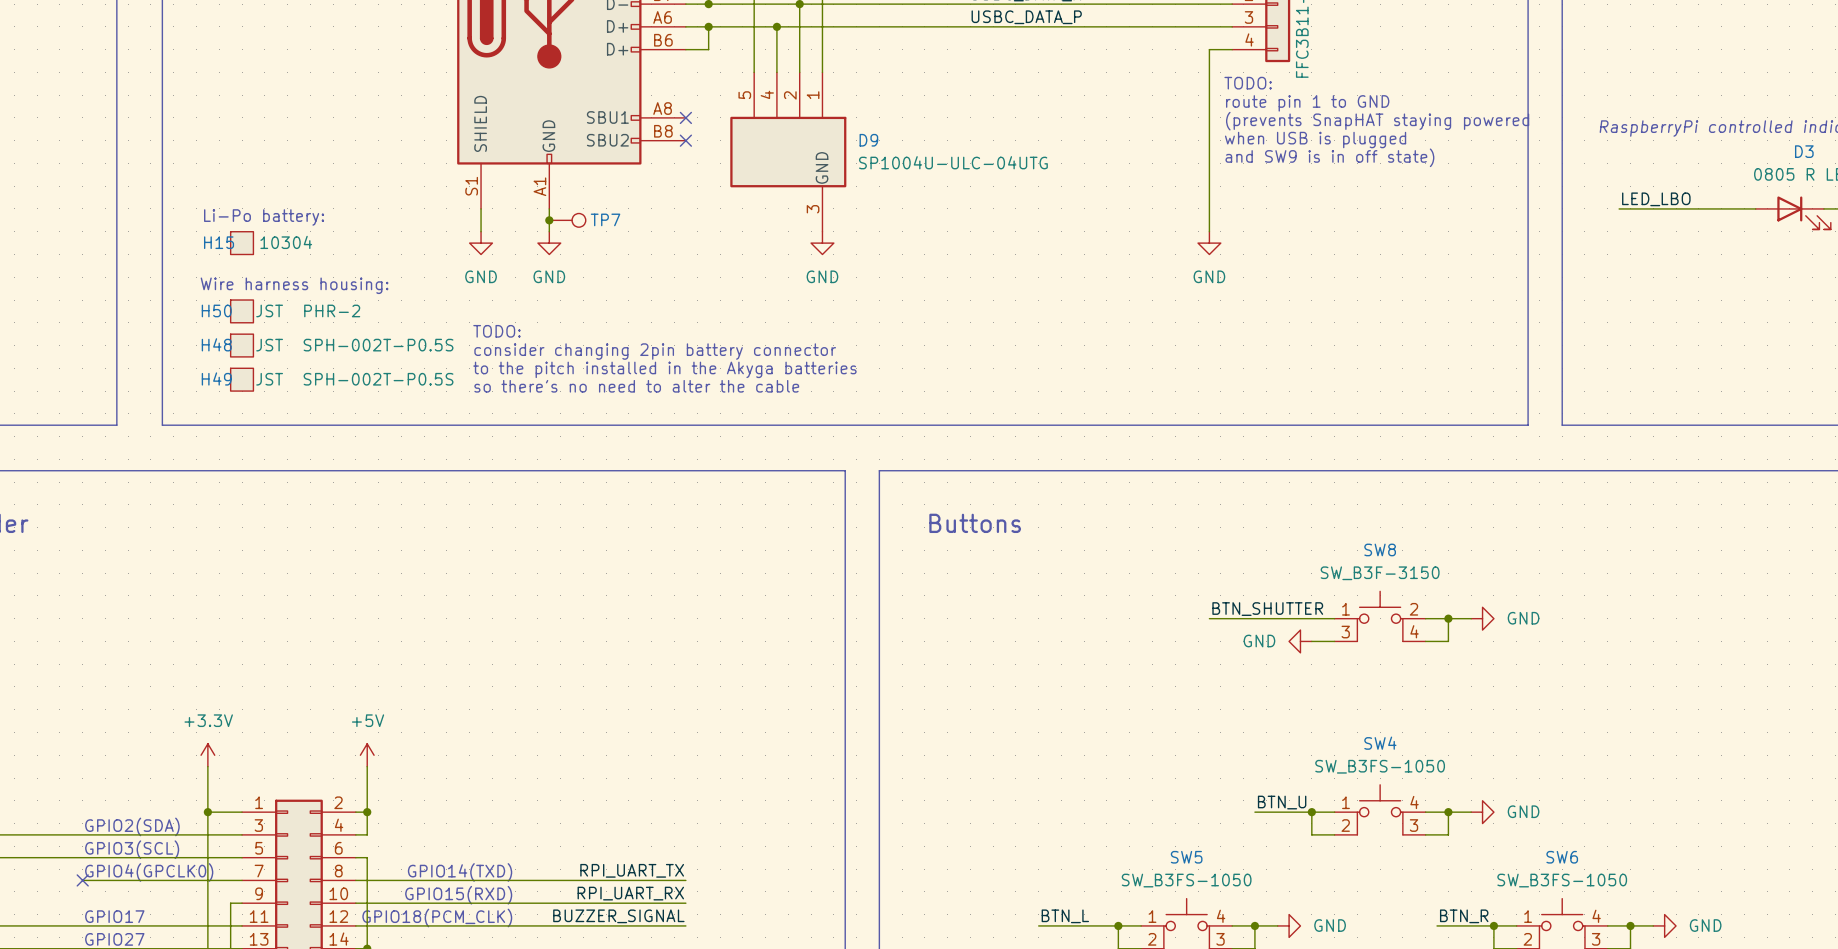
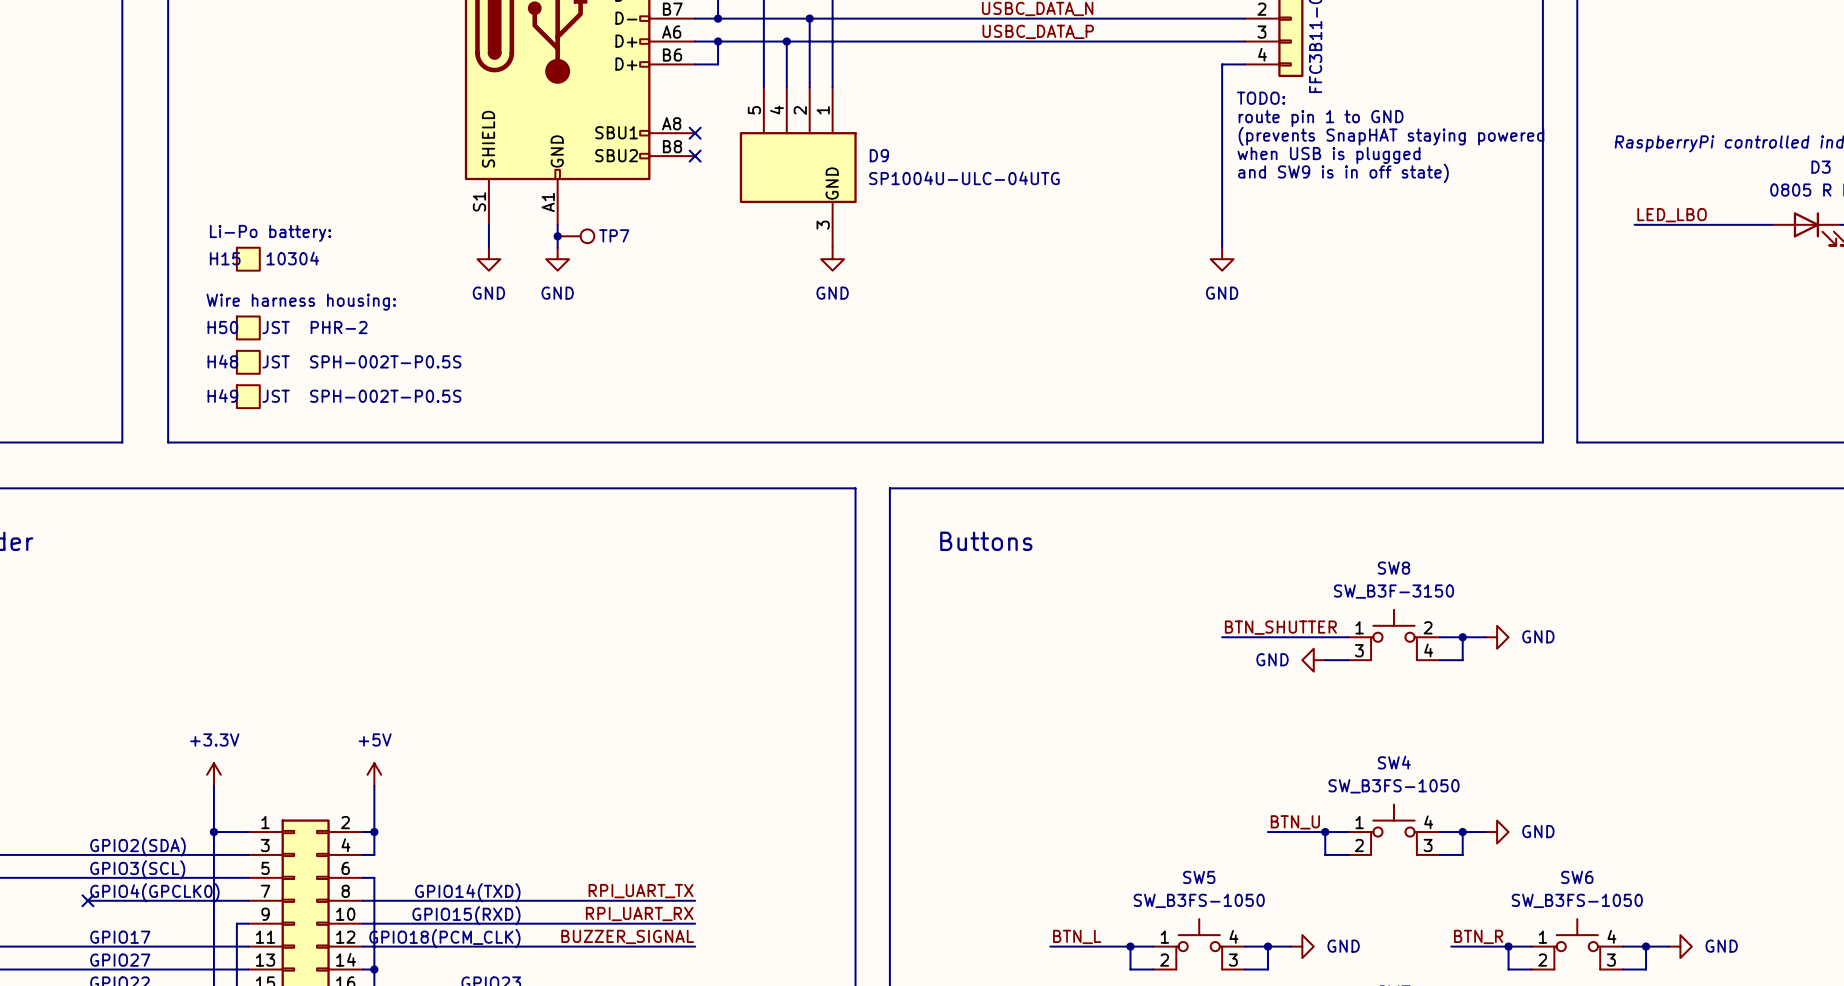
text: TODO: (496, 331) -> none
text: consider changing 2pin battery connector (655, 351) -> none
text: to the pitch installed in the Akyga batteries (664, 369) -> none
text: so there's no need to alter the cable (636, 386) -> none

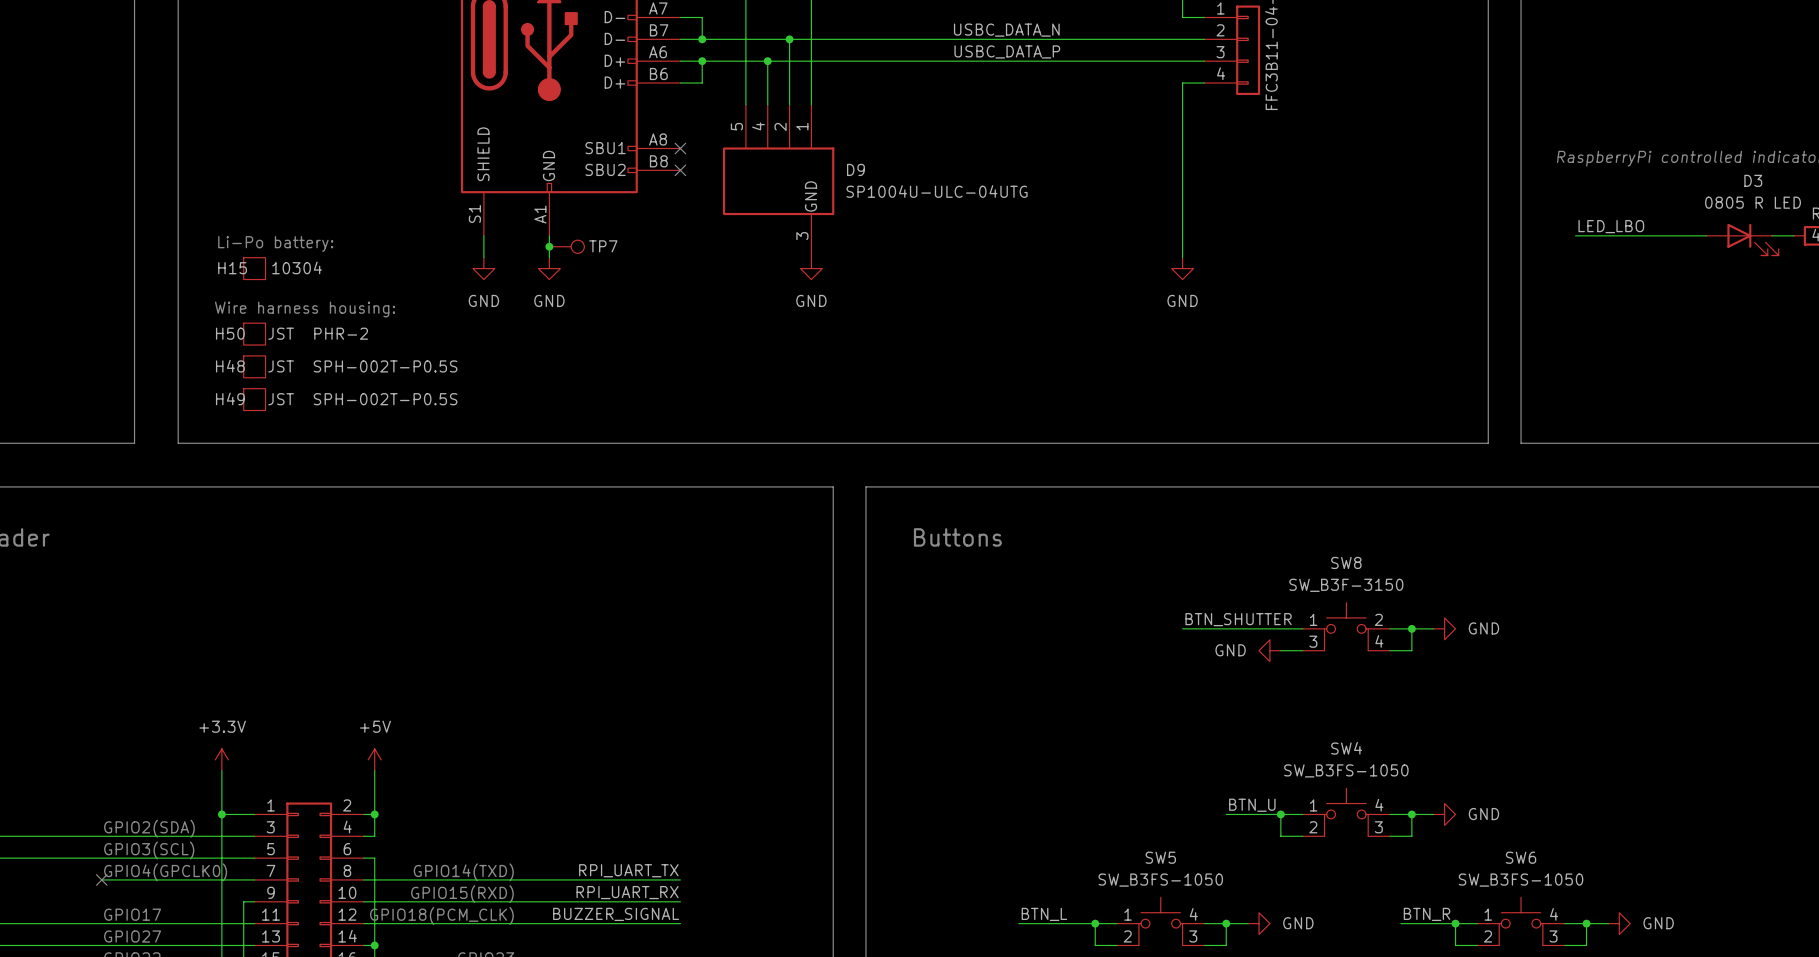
text: TODO: (1261, 98) -> none
text: route pin 1 to GND (1321, 118) -> none
text: (prevents SnapHAT staying powered (1391, 136) -> none
text: when USB is plugged (1328, 155) -> none
text: and SW9 is in off state) (1343, 173) -> none

